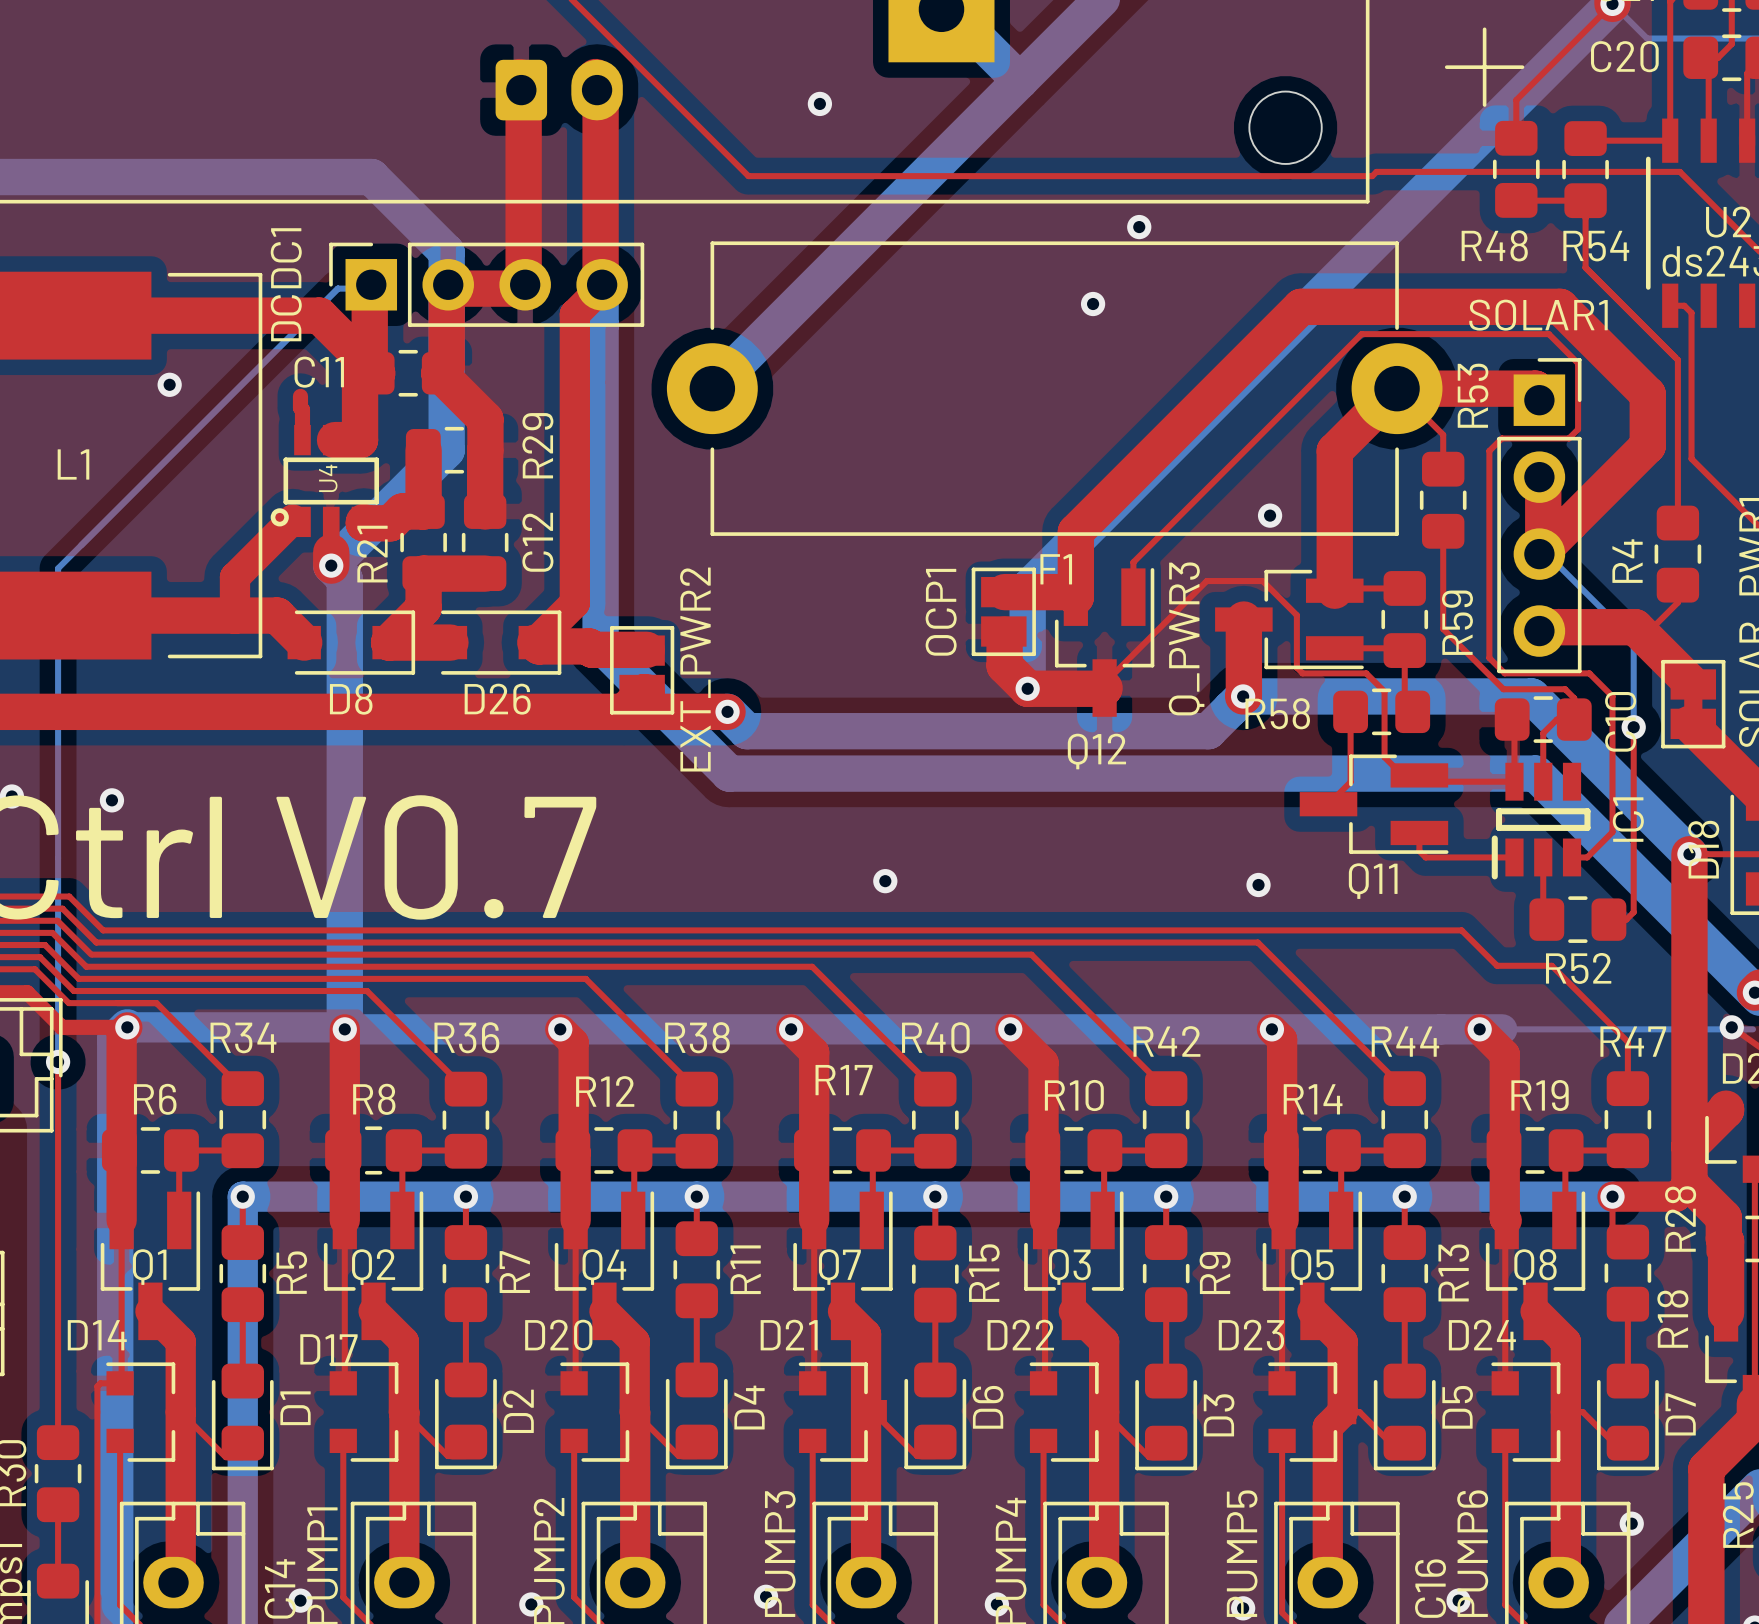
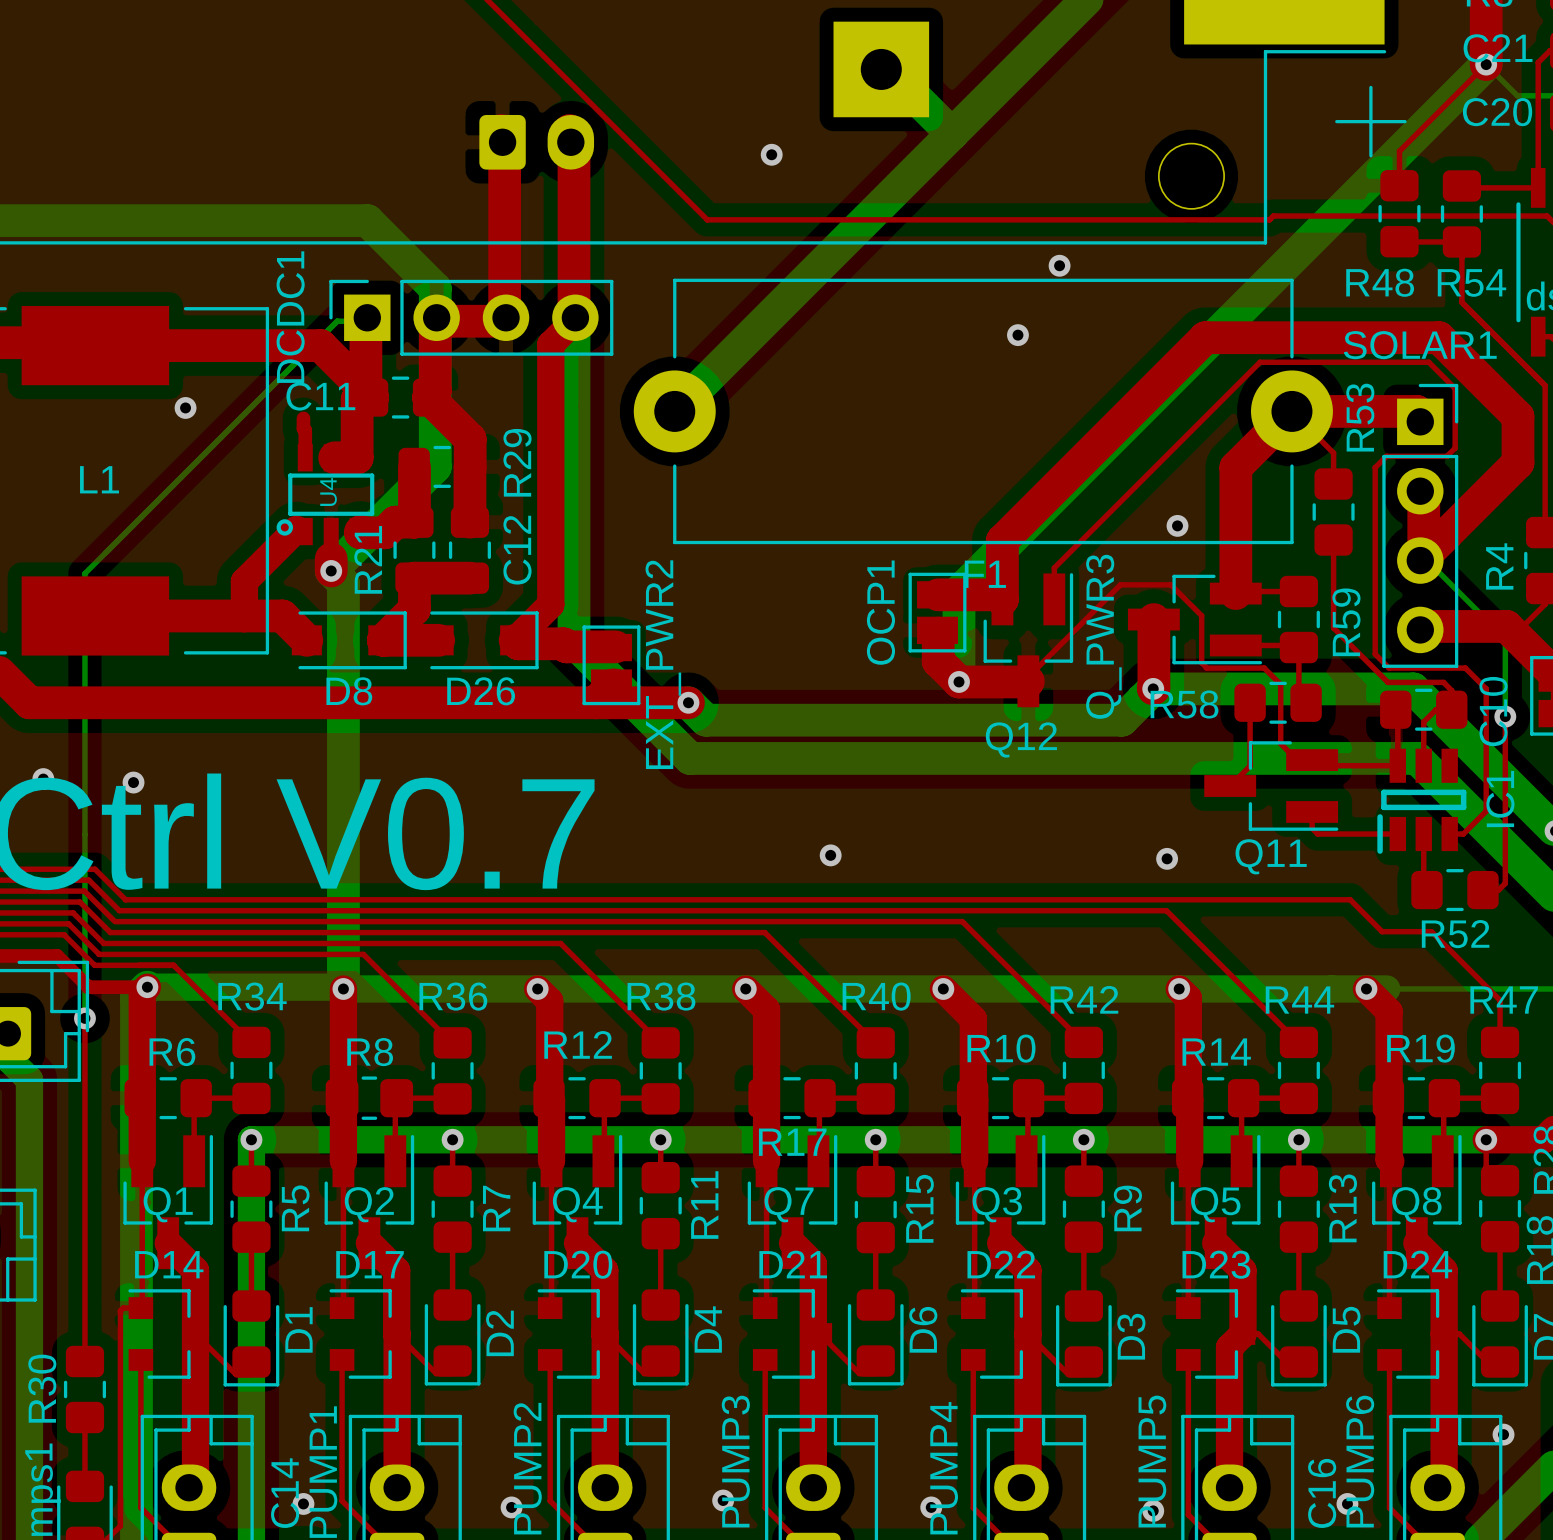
R17 name position: R17 (844, 1080) -> R17 (792, 1142)
D14 name position: D14 (97, 1335) -> D14 (169, 1264)
D20 name position: D20 (558, 1335) -> D20 (578, 1264)
D21 name position: D21 (789, 1335) -> D21 (793, 1264)
D22 name position: D22 (1020, 1335) -> D22 (1001, 1264)
D23 name position: D23 (1251, 1335) -> D23 (1216, 1264)
D24 name position: D24 (1482, 1335) -> D24 (1417, 1264)
D17 name position: D17 (328, 1349) -> D17 (370, 1264)

